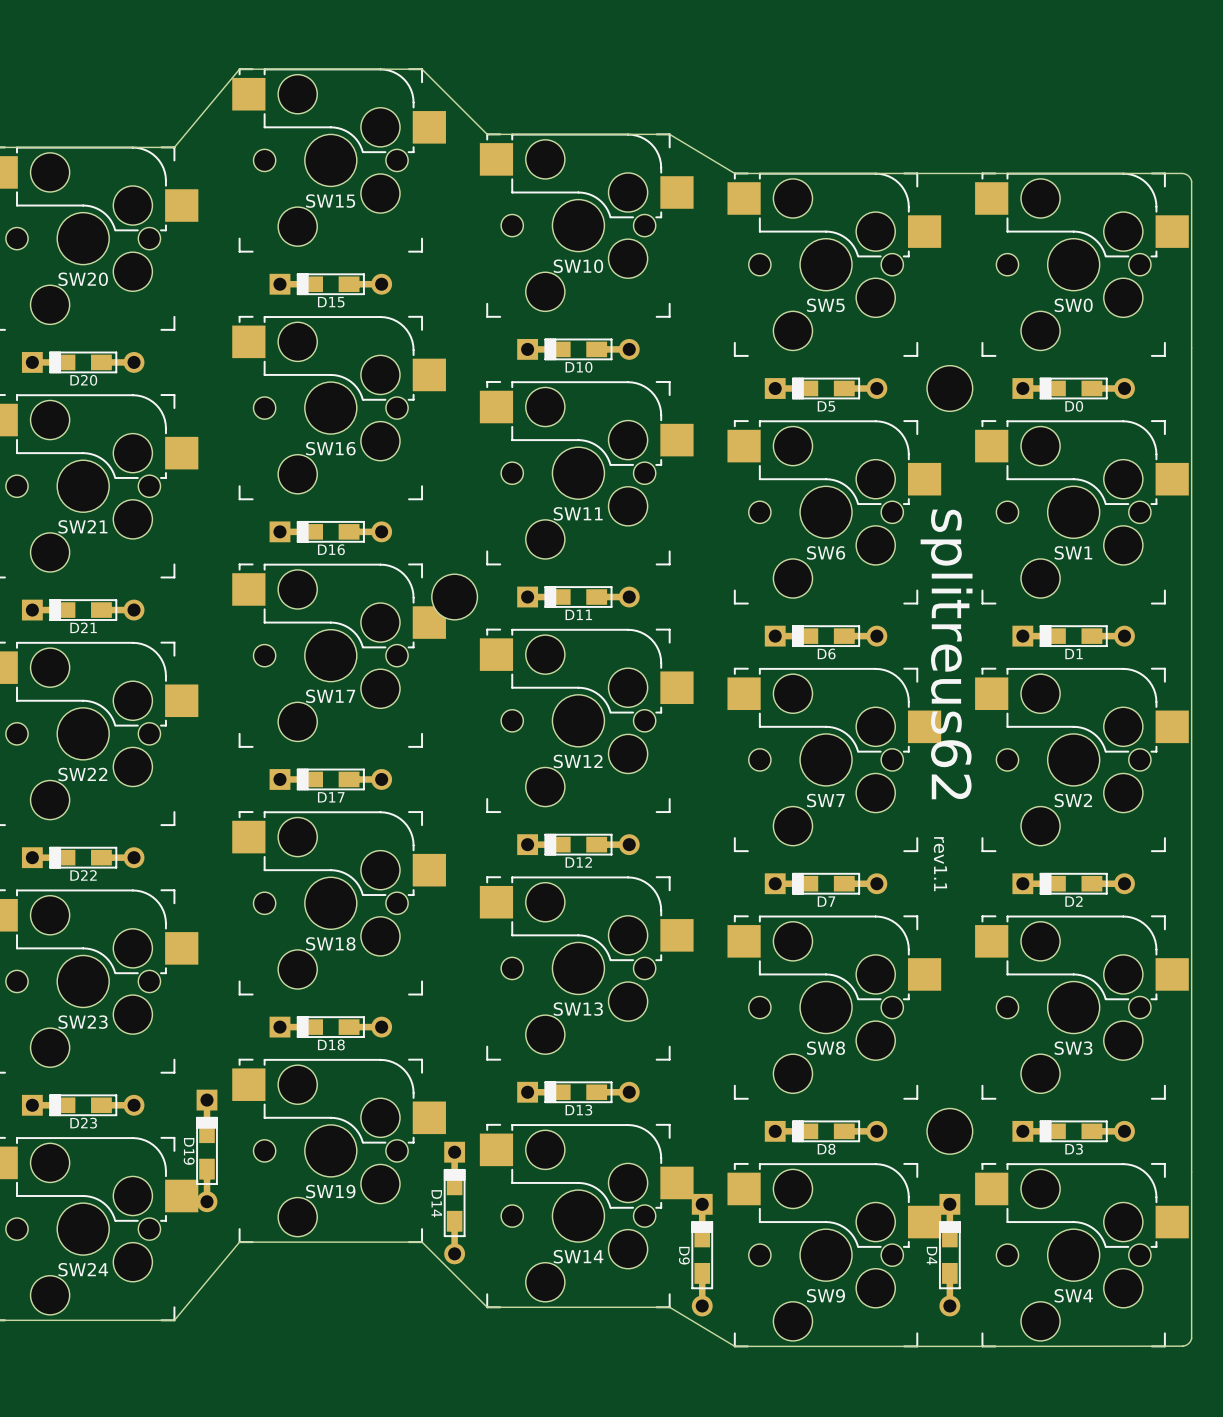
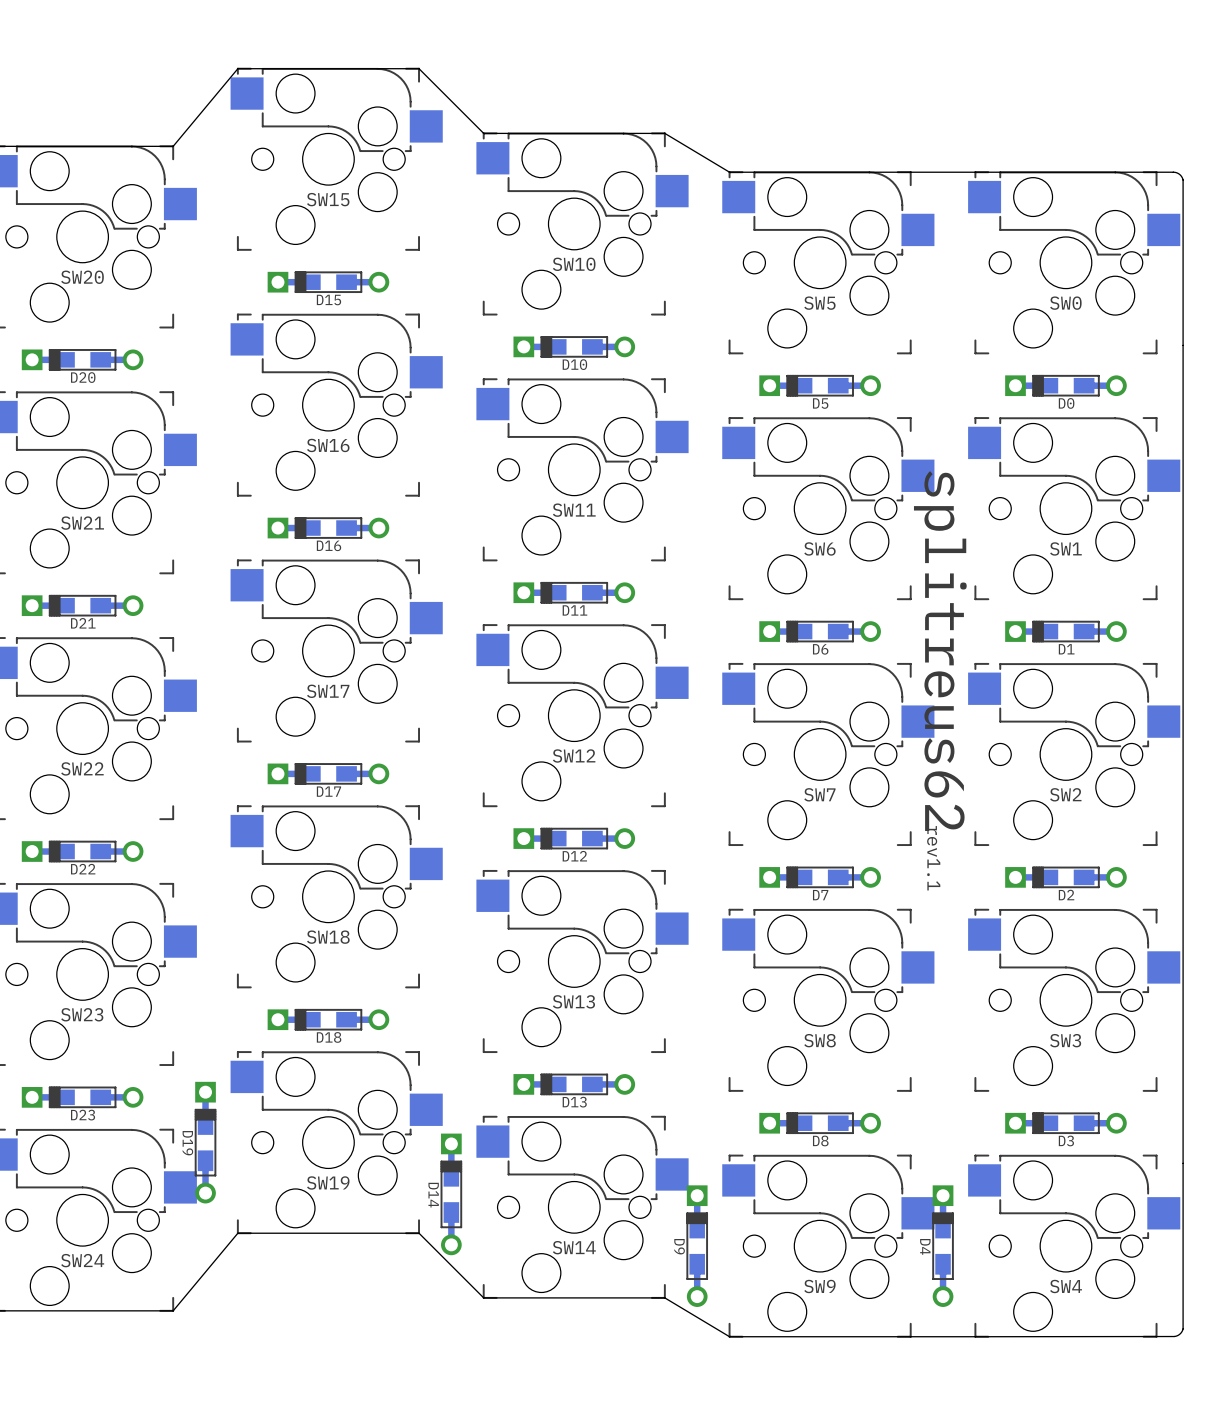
part: (949, 388) -> none
part: (454, 597) -> none
part: (949, 1131) -> none

